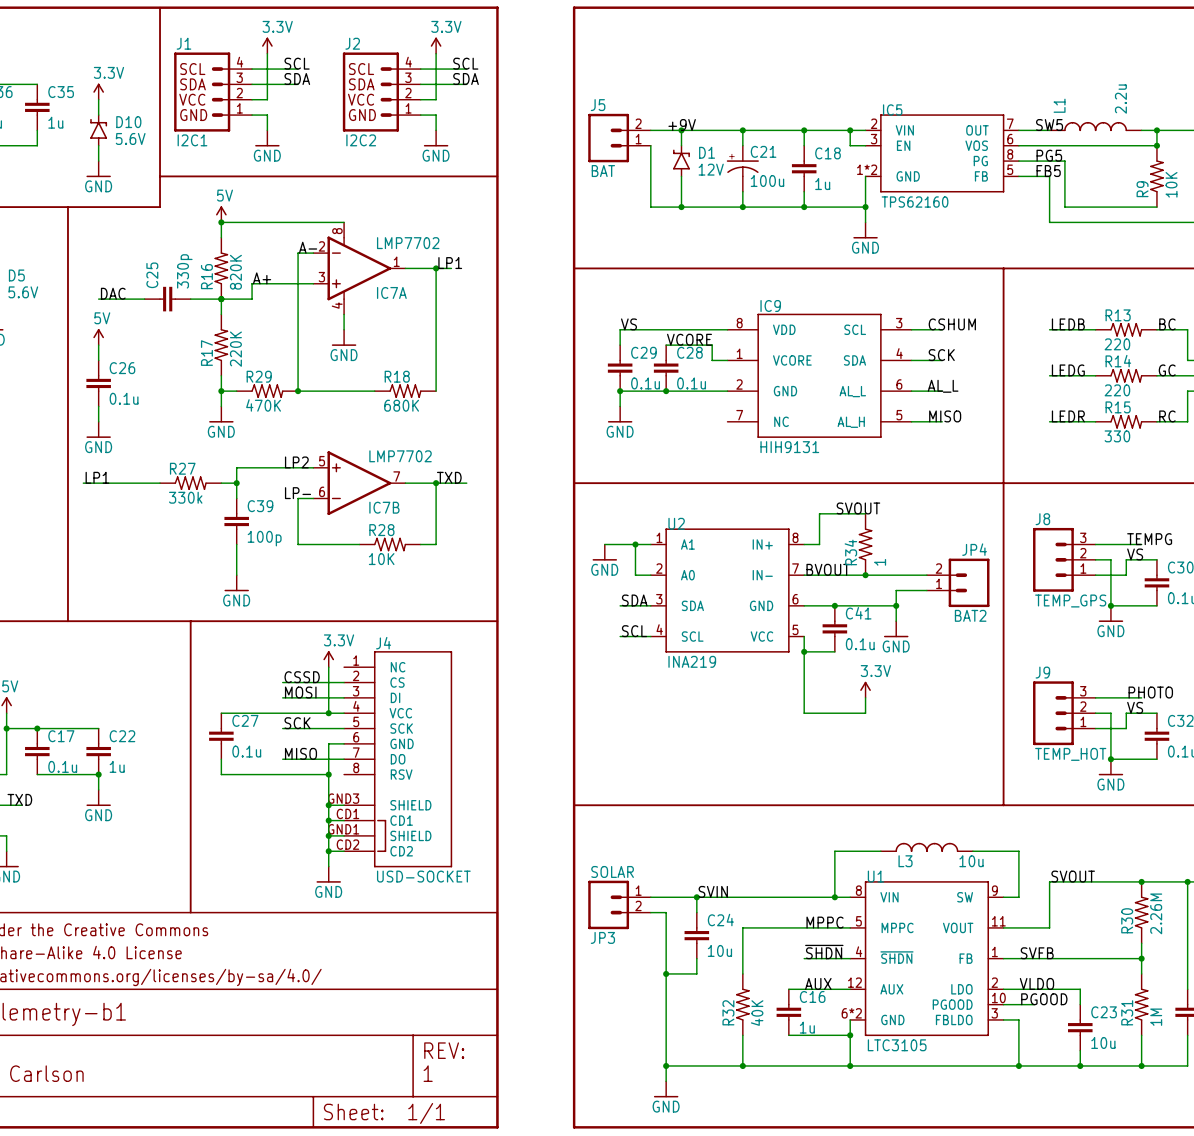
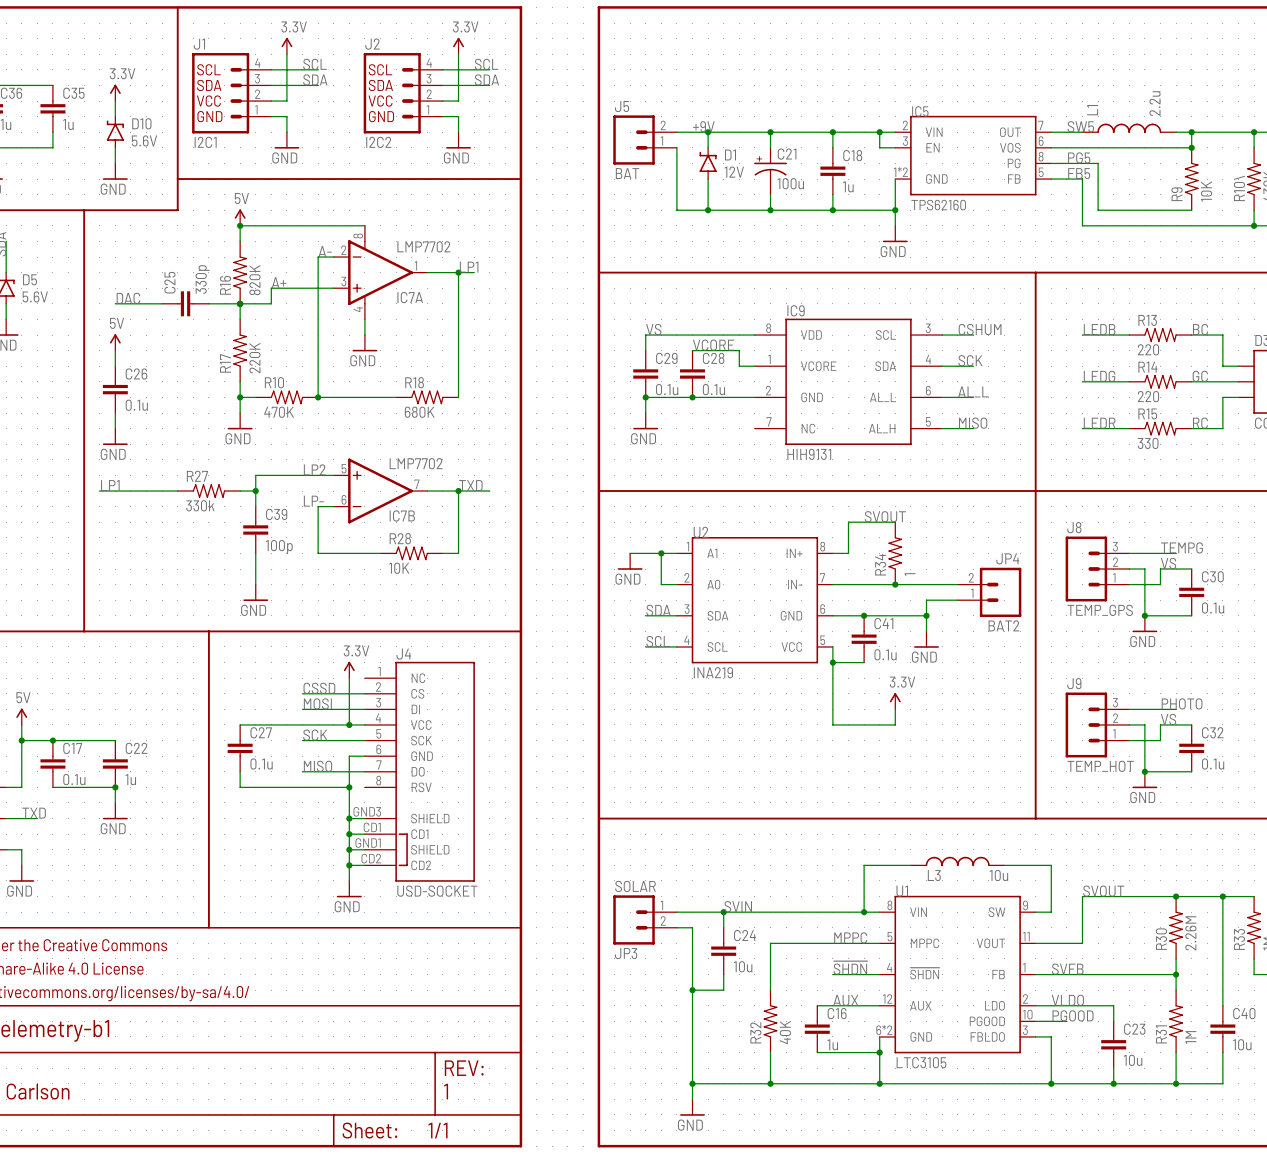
R29 name: R29 (259, 376) -> R10 (274, 382)
label: BVOUT (828, 569) -> none

